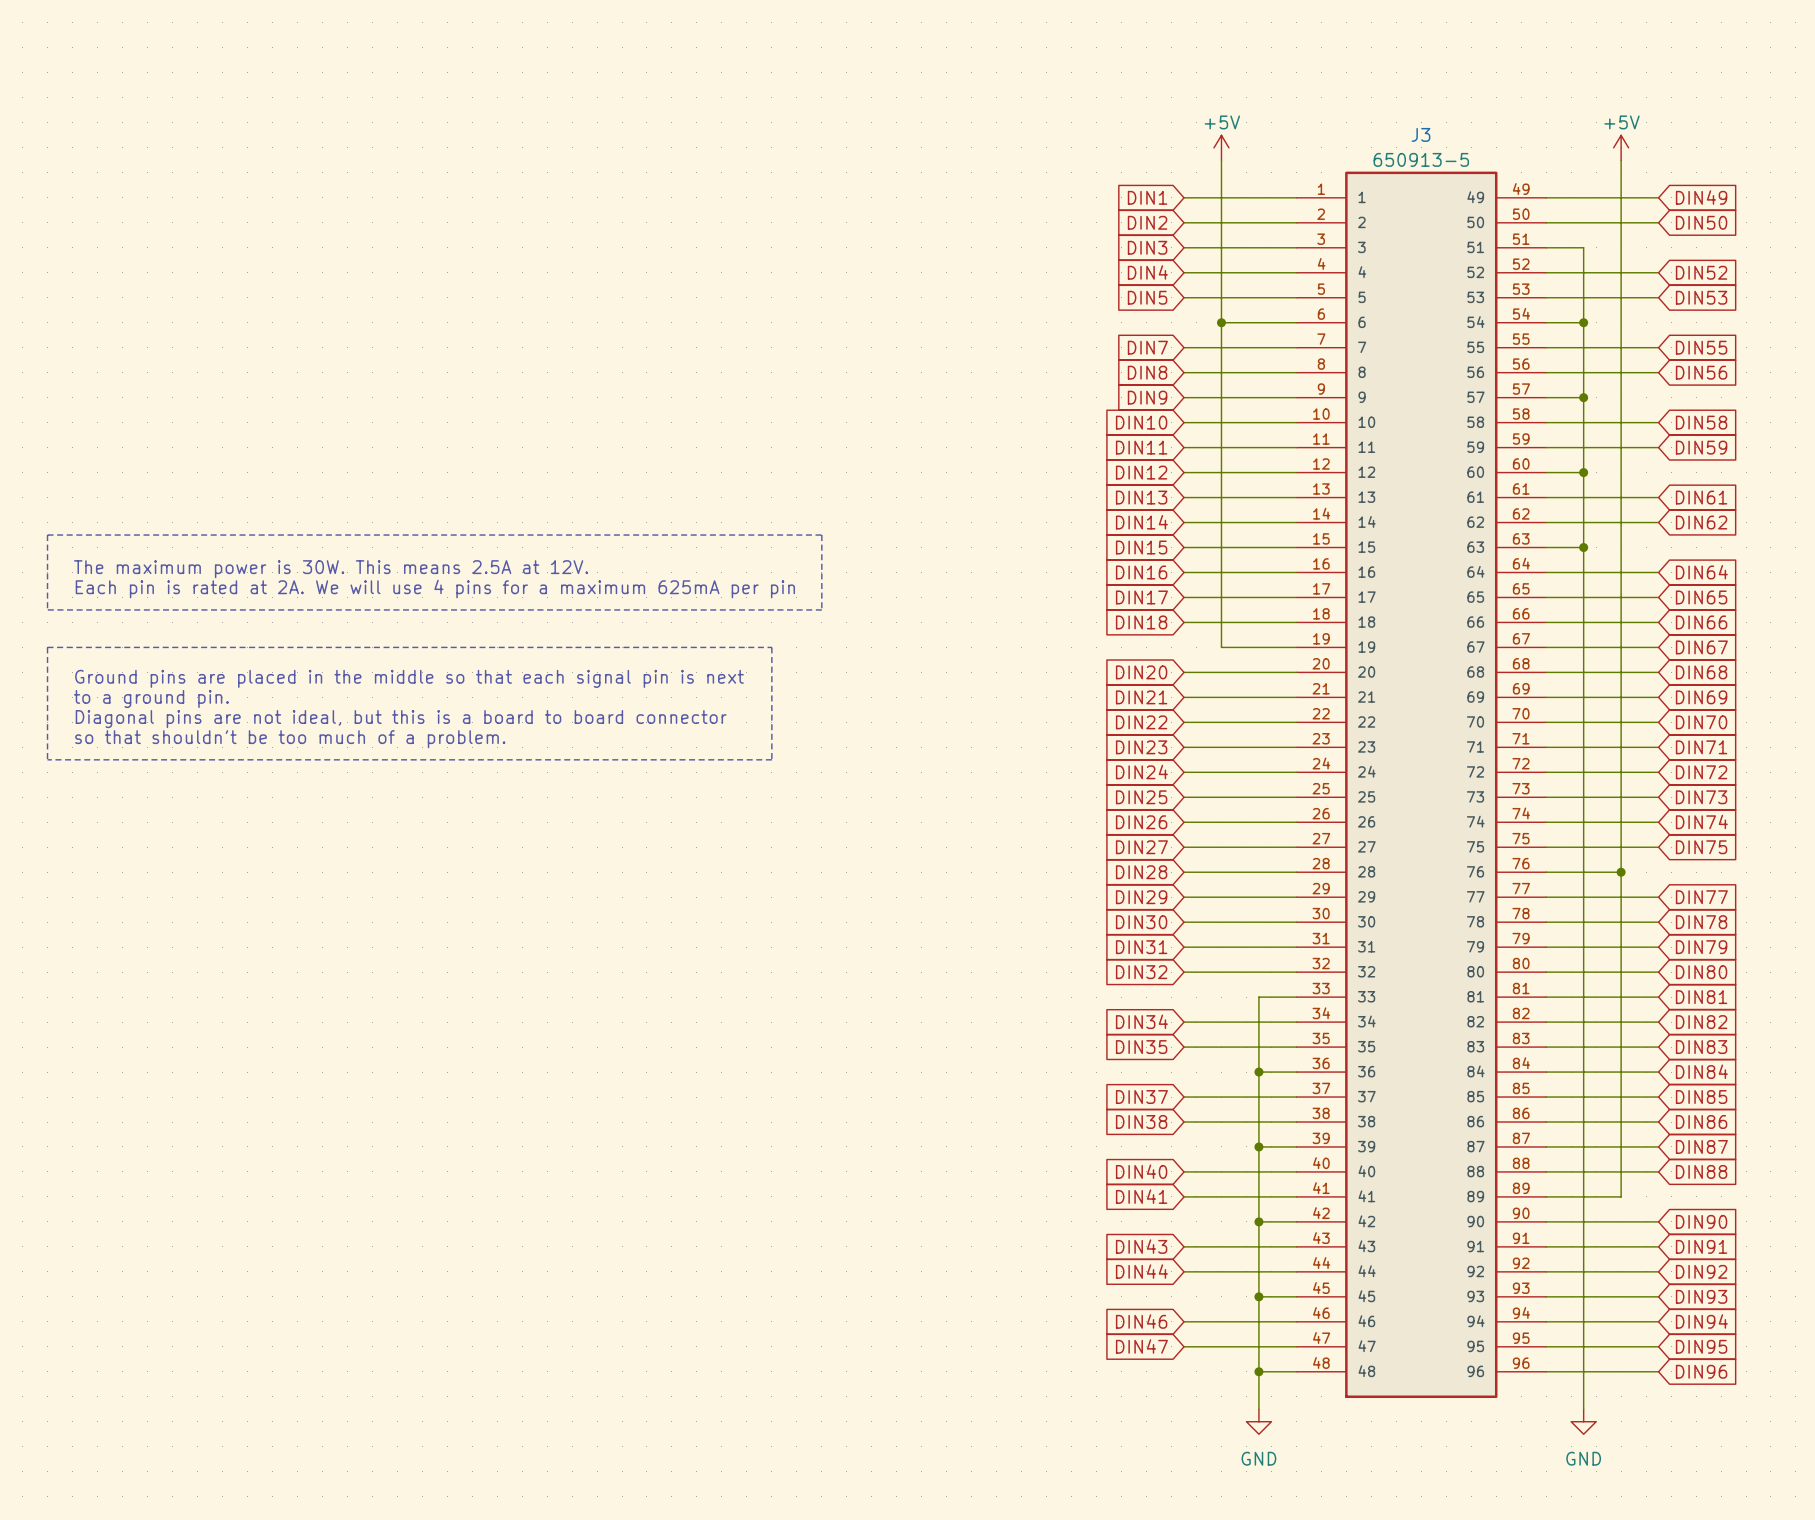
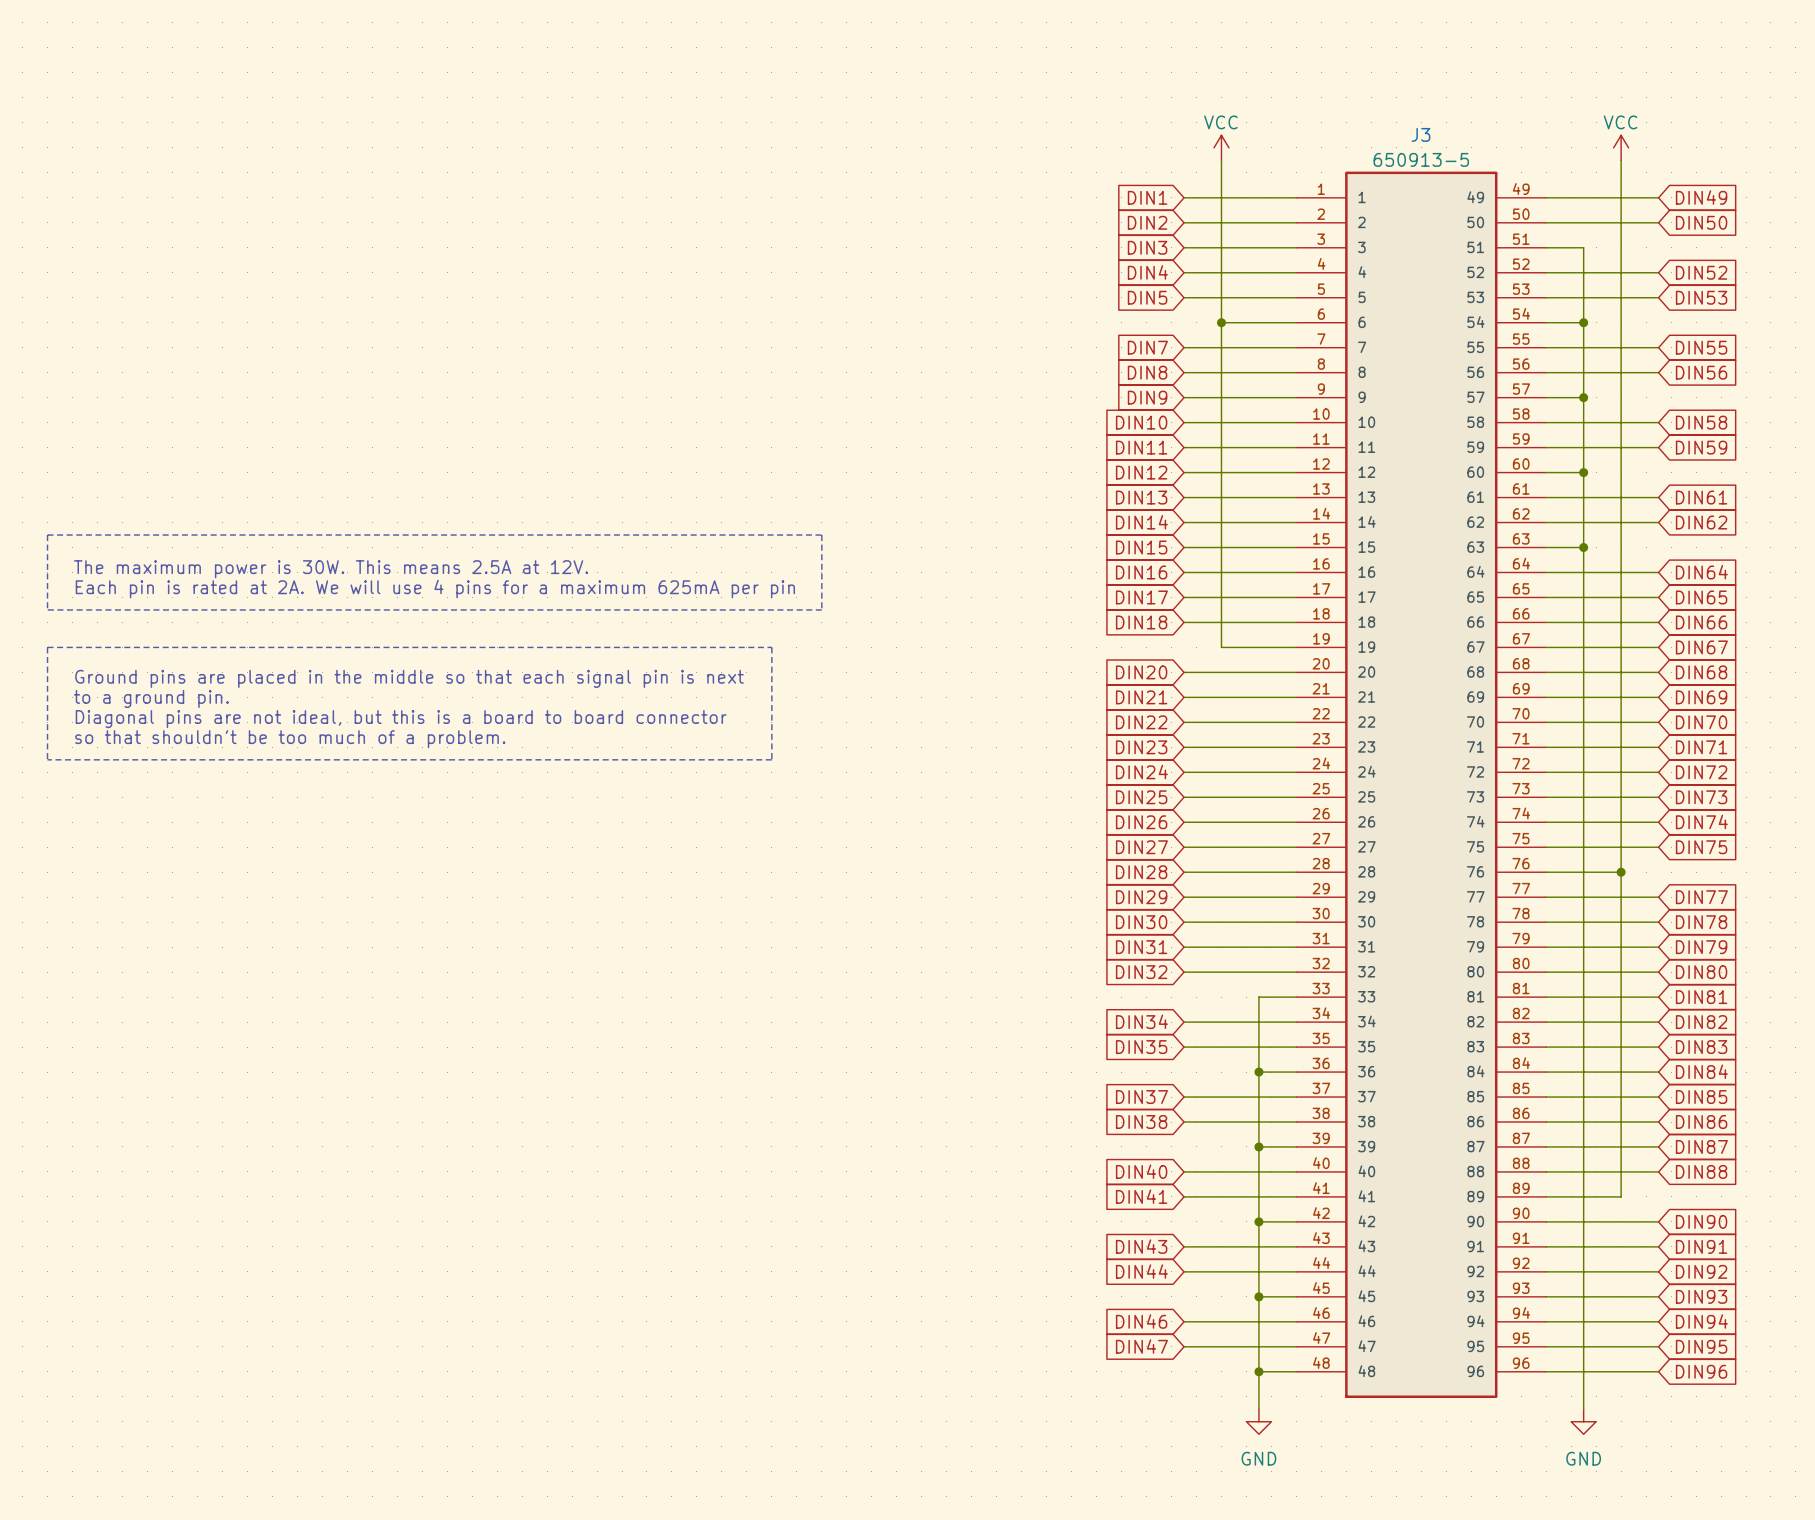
power symbol: +5V (1221, 147) -> VCC (1221, 147)
power symbol: +5V (1621, 147) -> VCC (1621, 147)

